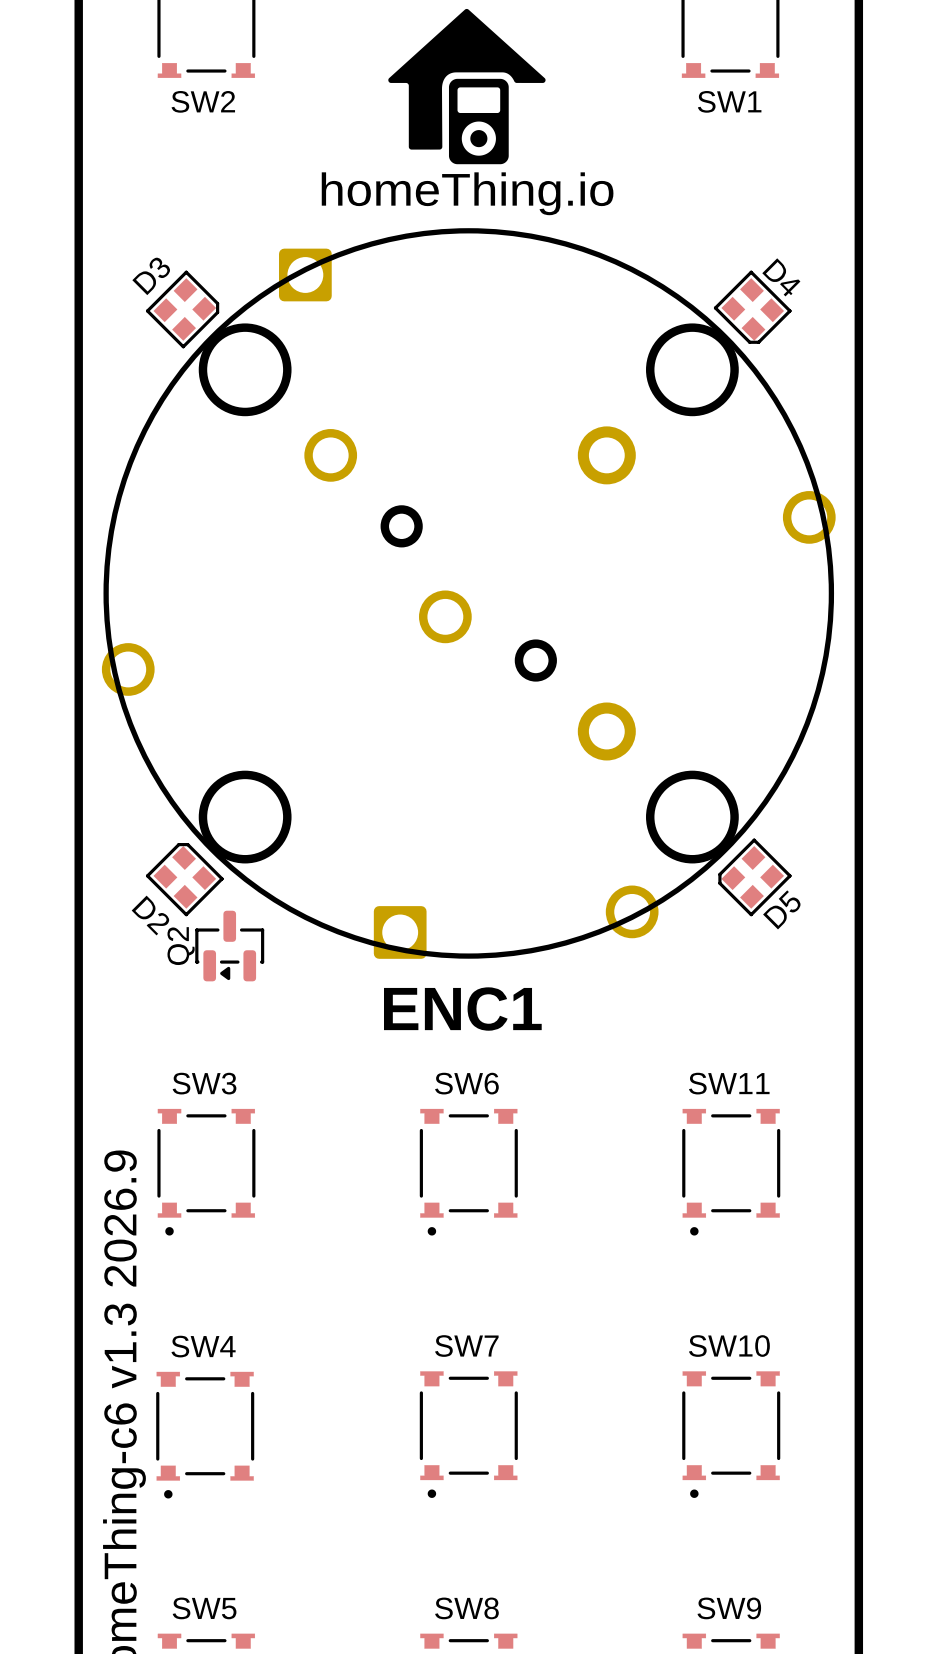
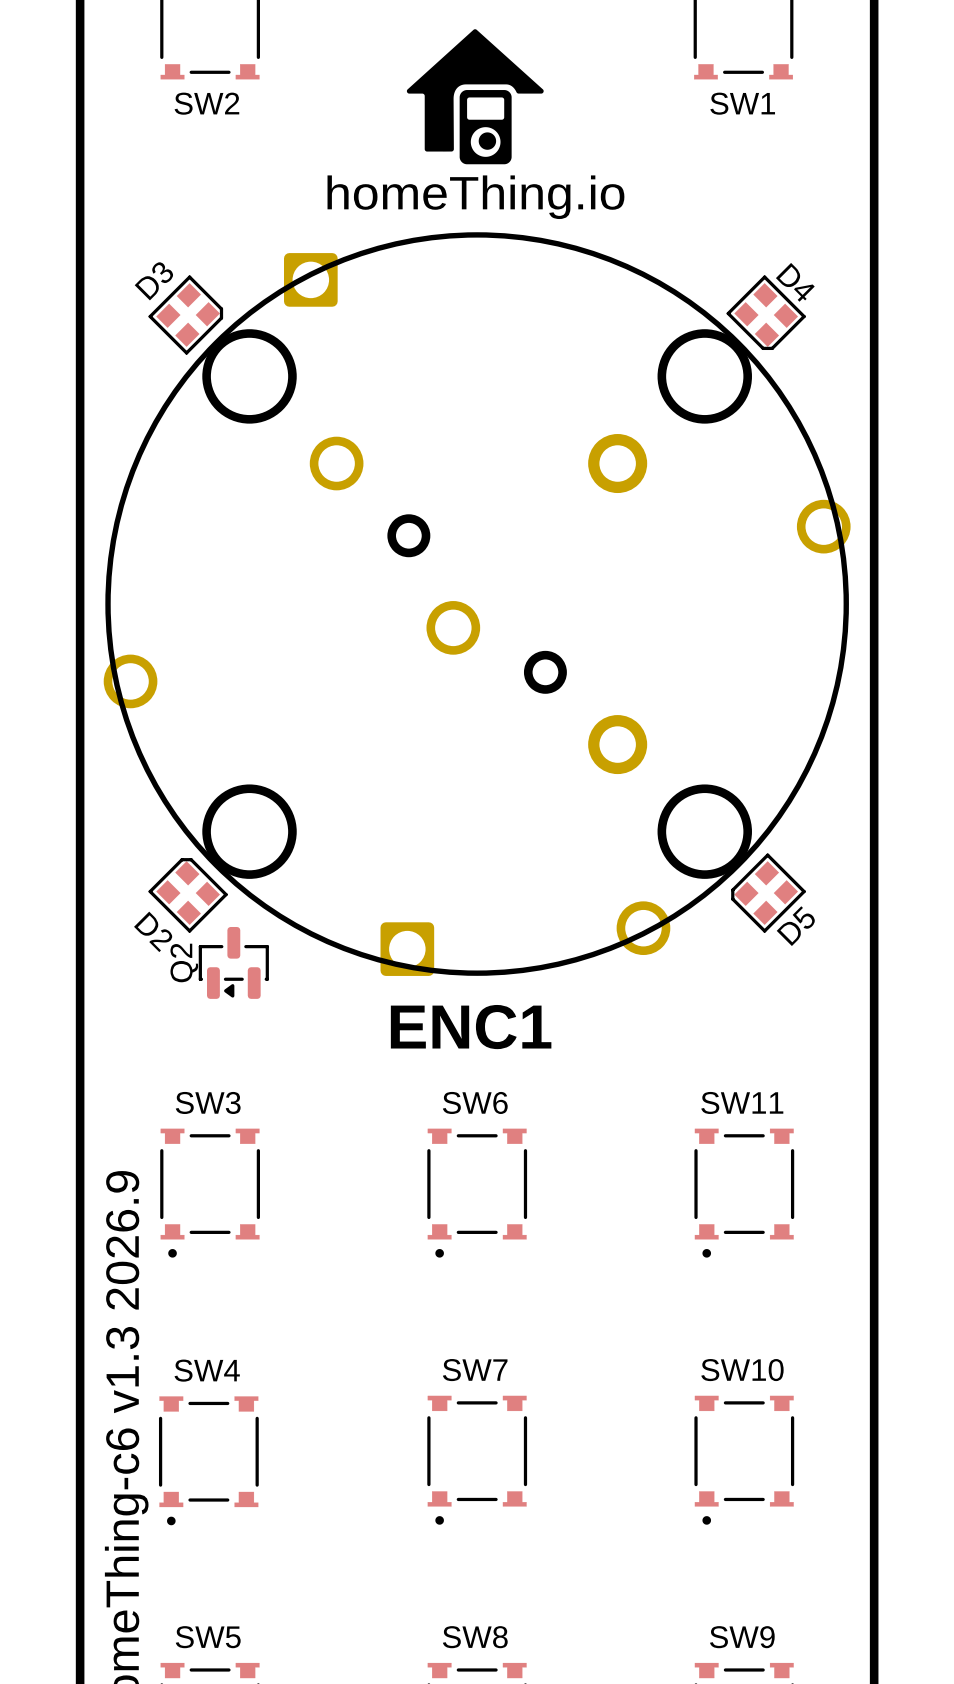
drawing shape: [388, 8, 546, 150] -> [406, 29, 544, 152]
drawing shape: [448, 78, 509, 165] -> [459, 90, 512, 165]

